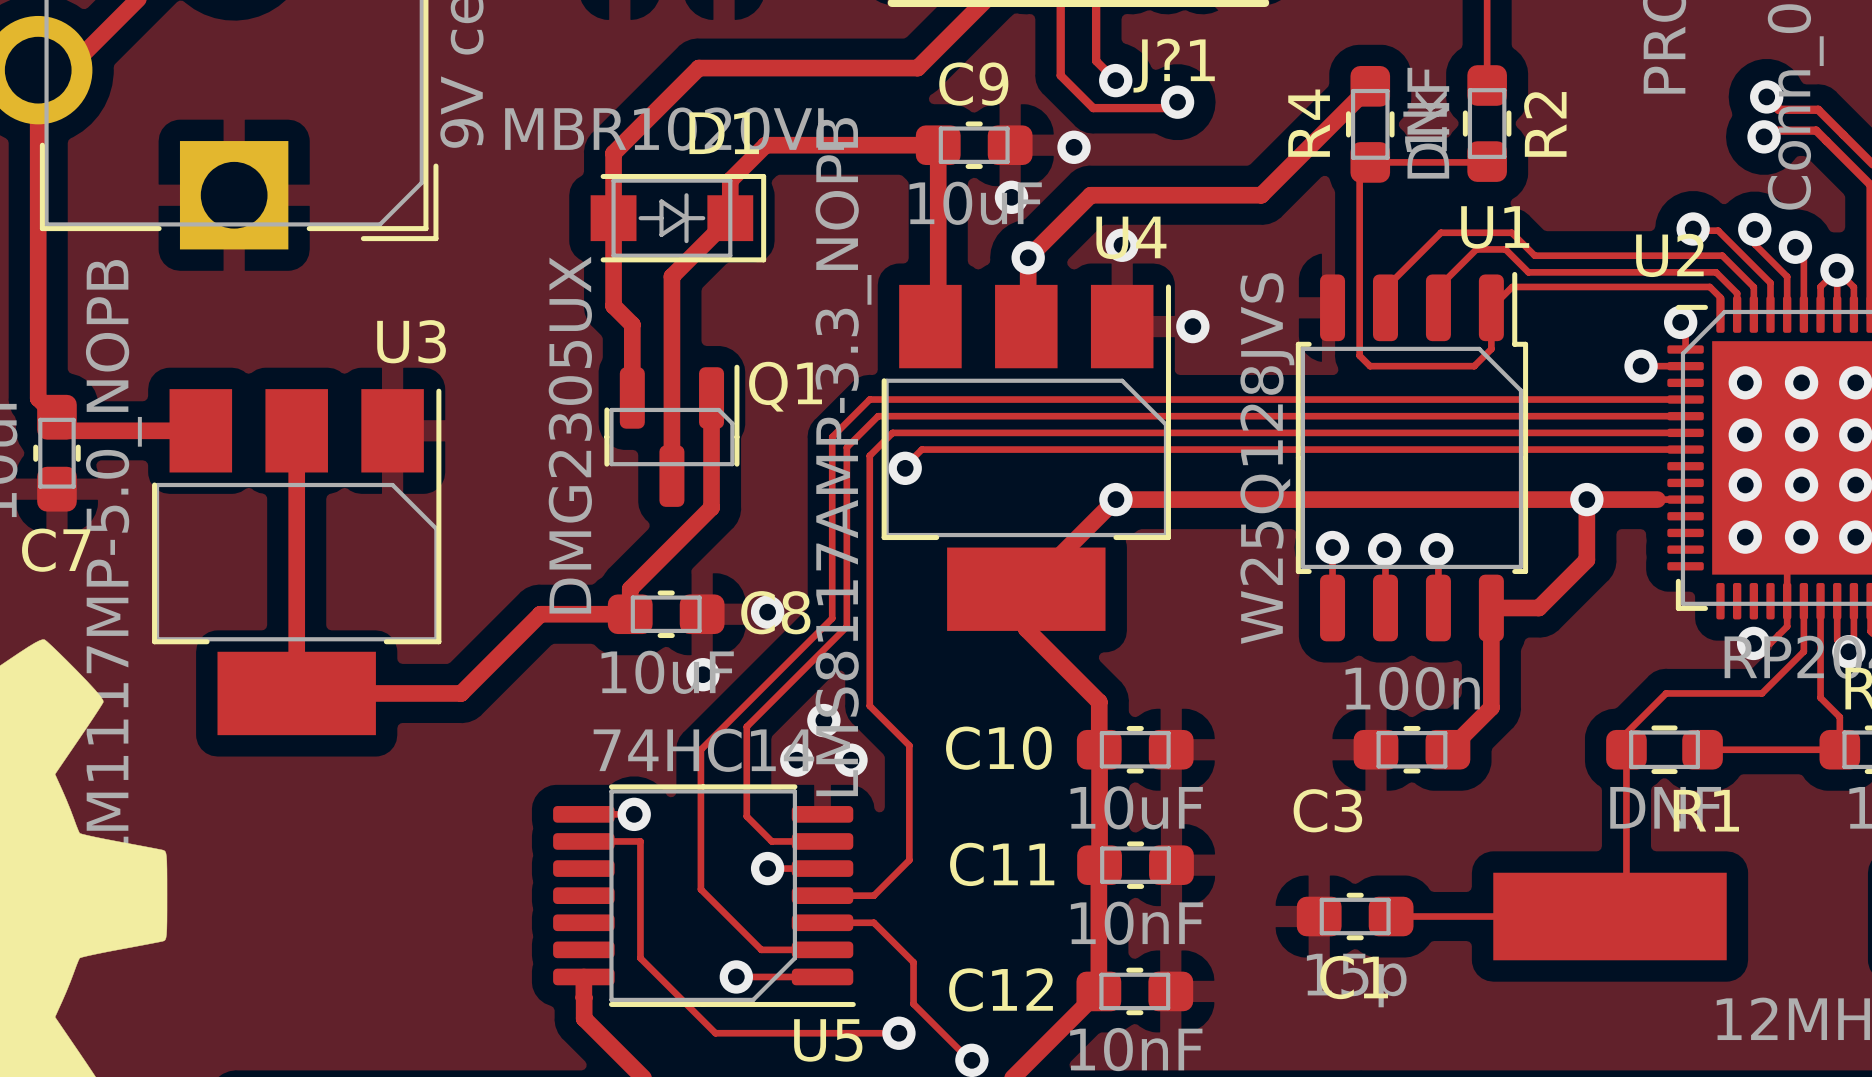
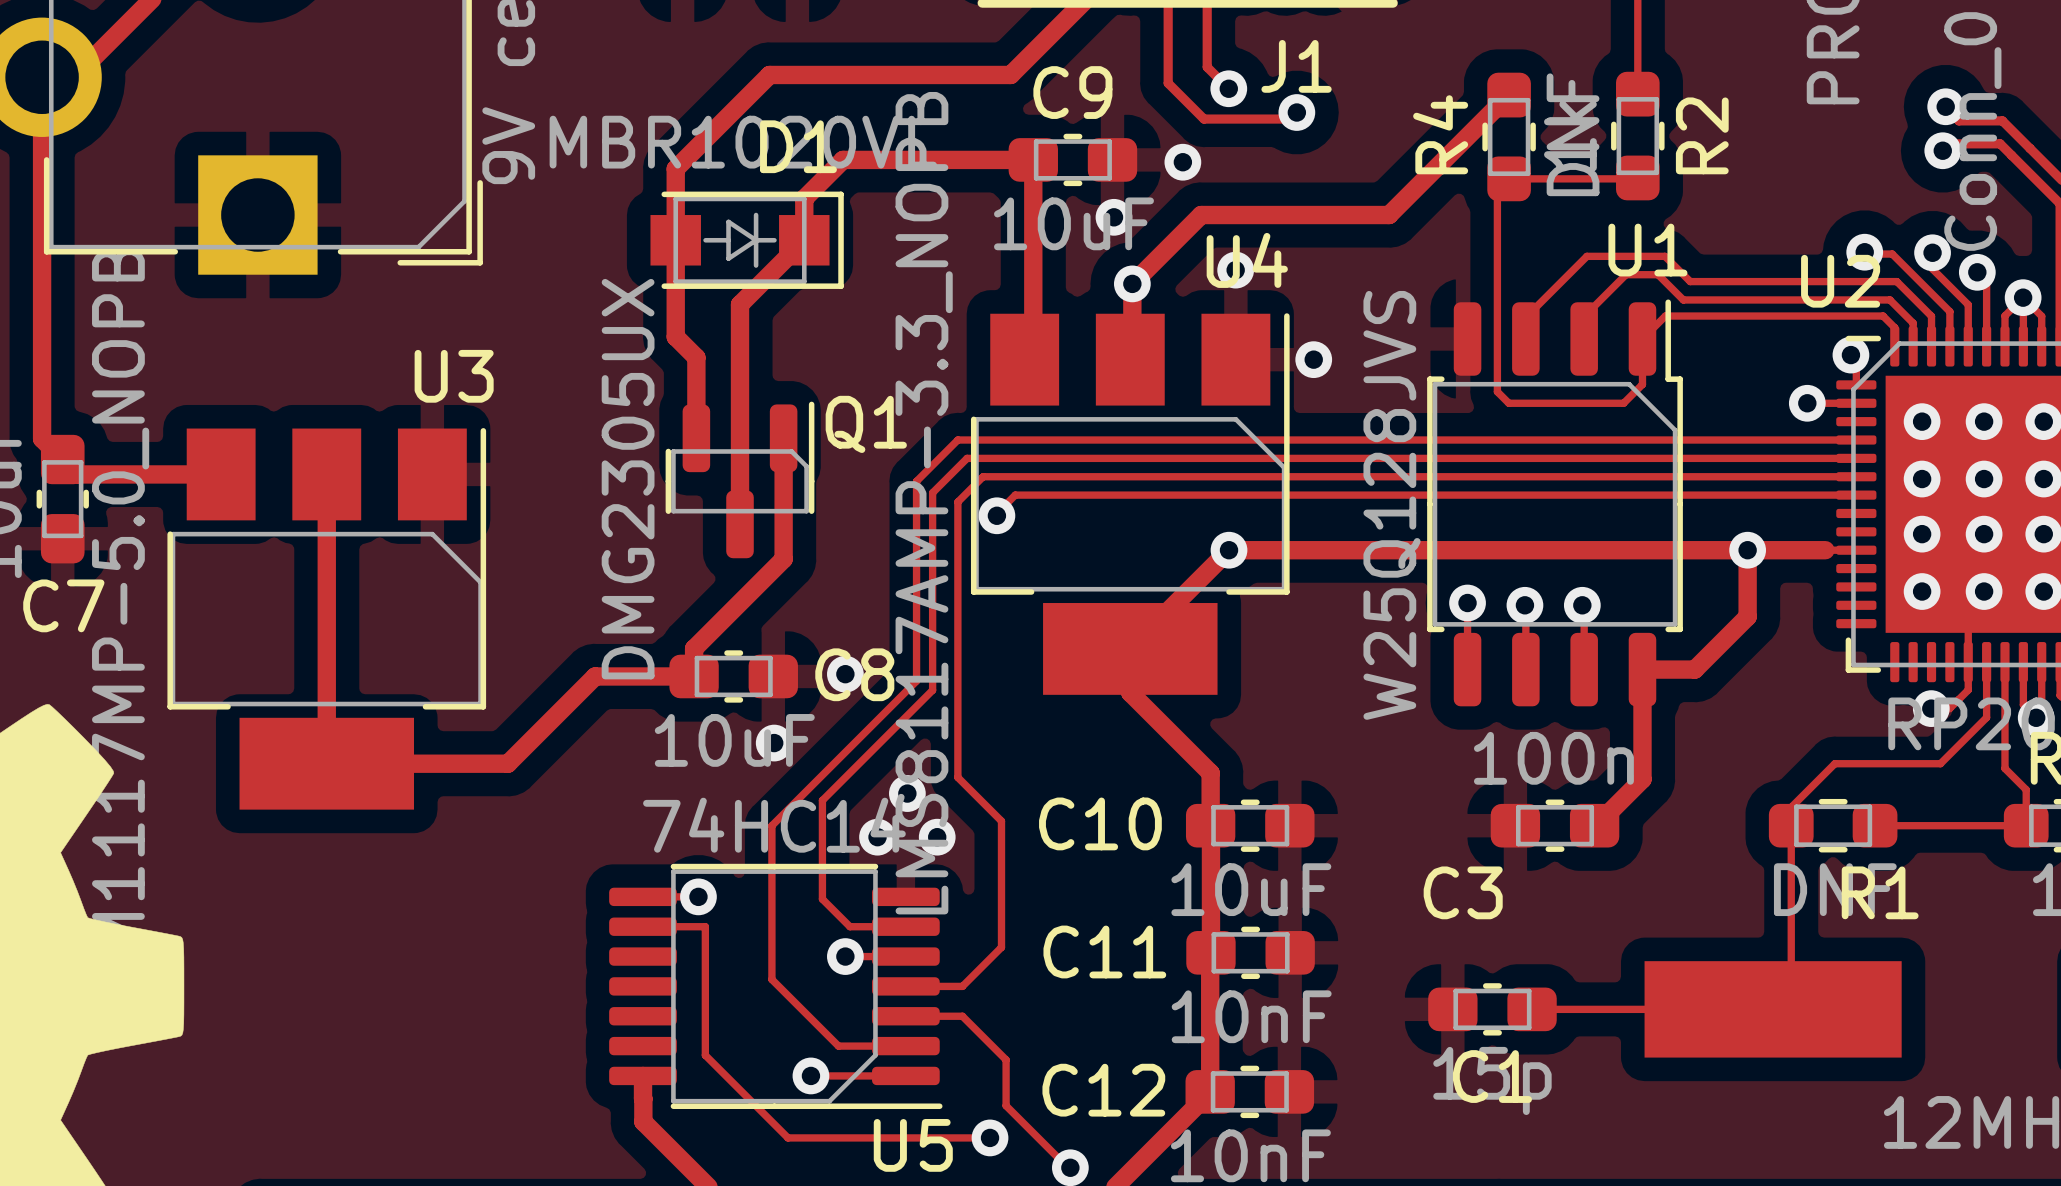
J?1 name: J?1 (1174, 65) -> J1 (1296, 66)

